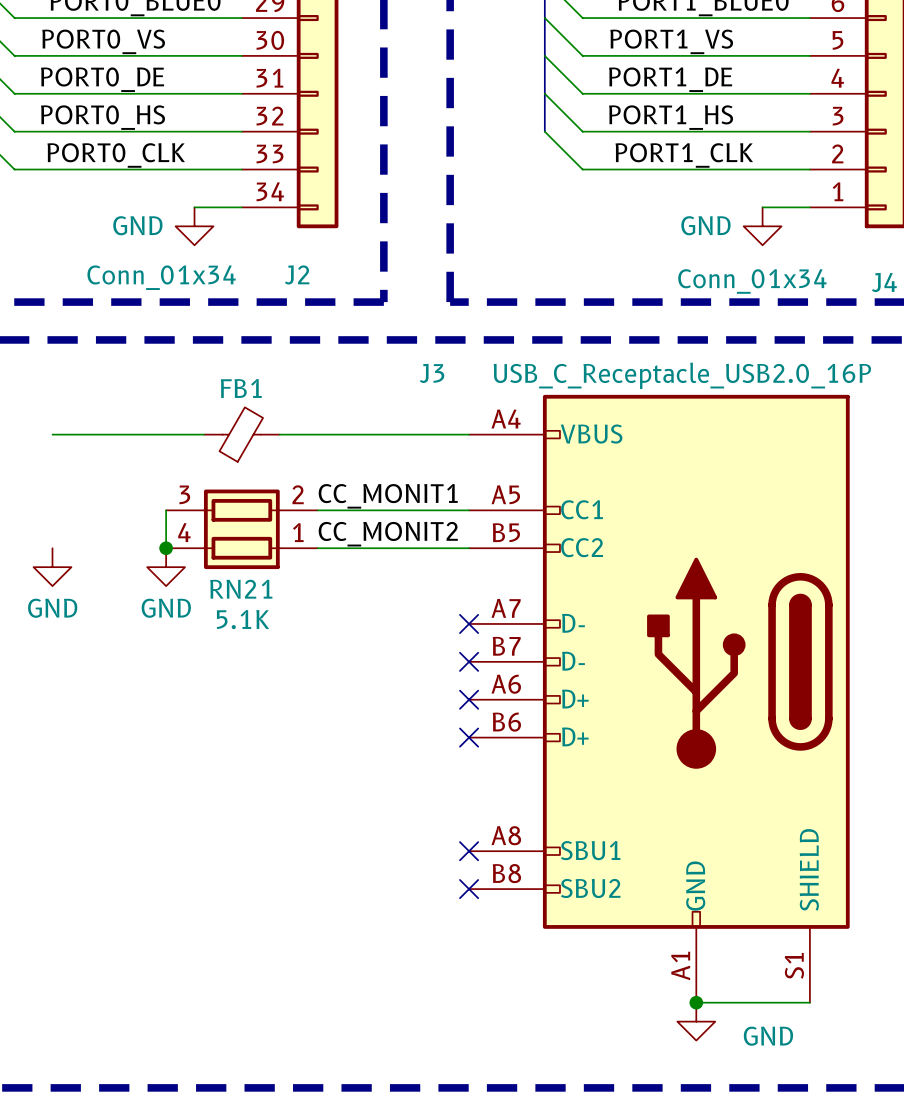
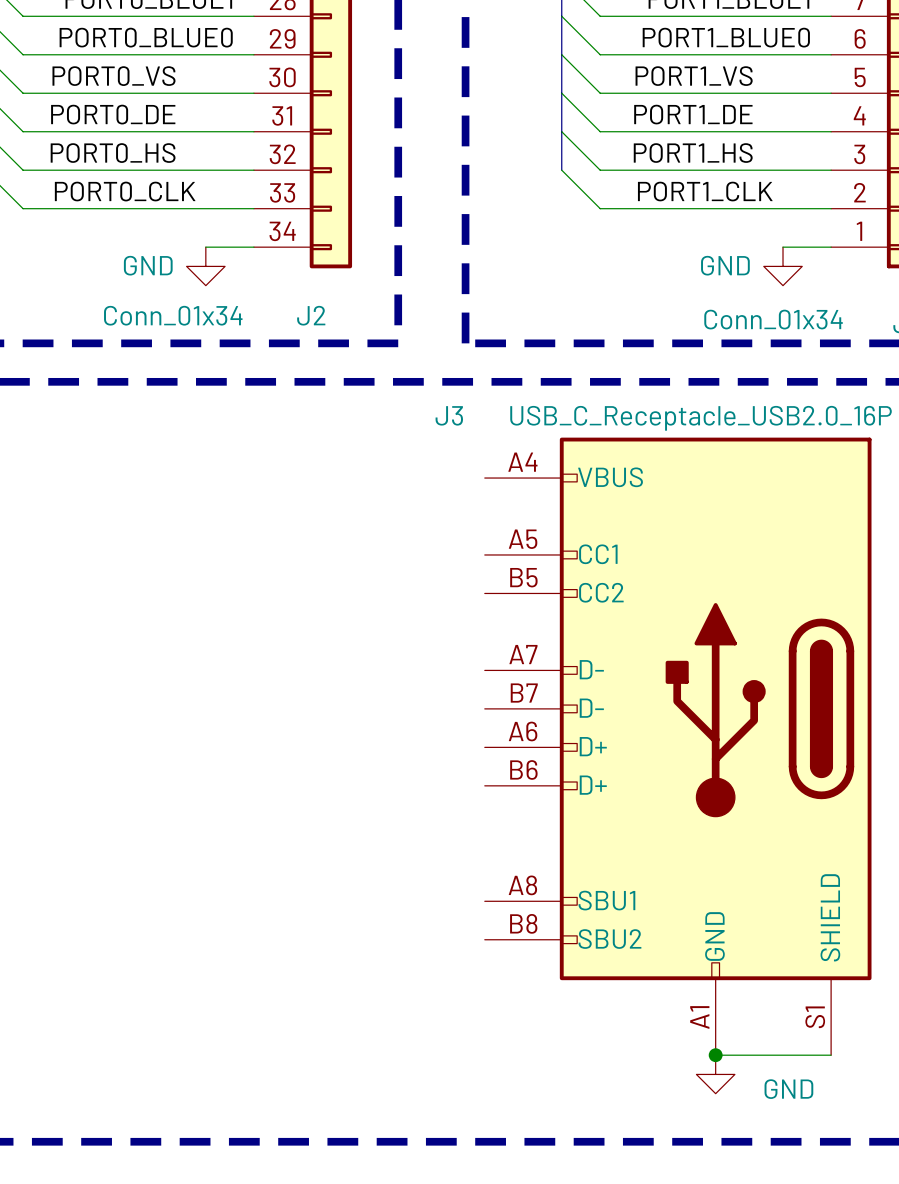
wire: (52, 434) (203, 434) -> none
FB1: (241, 434) -> none
wire: (279, 434) (469, 434) -> none
label: CC_MONIT1 (388, 496) -> none
wire: (166, 510) (166, 548) -> none
wire: (317, 510) (469, 510) -> none
RN21: 5.1K (241, 529) -> none
label: CC_MONIT2 (388, 534) -> none
junction: (166, 548) -> none
wire: (317, 548) (469, 548) -> none
power symbol: GND (52, 567) -> none
power symbol: GND (166, 567) -> none
no-connect mark: (469, 623) -> none
no-connect mark: (469, 661) -> none
no-connect mark: (469, 699) -> none
no-connect mark: (469, 737) -> none
no-connect mark: (469, 851) -> none
no-connect mark: (469, 889) -> none

